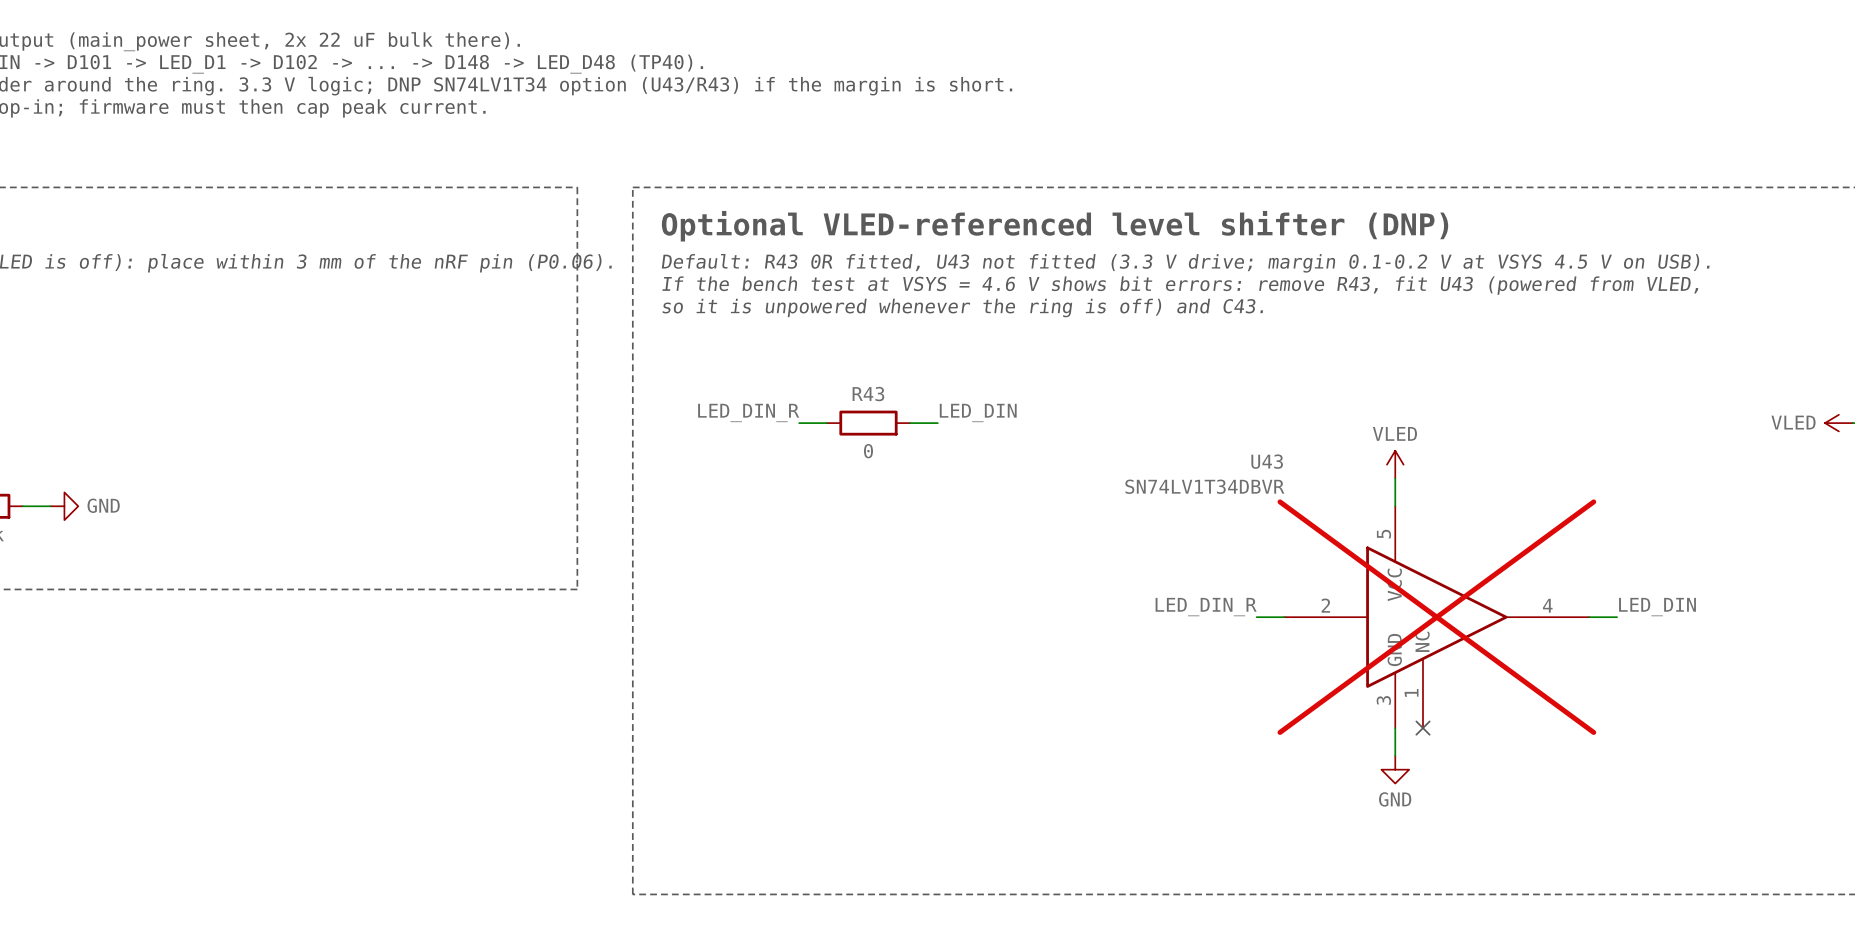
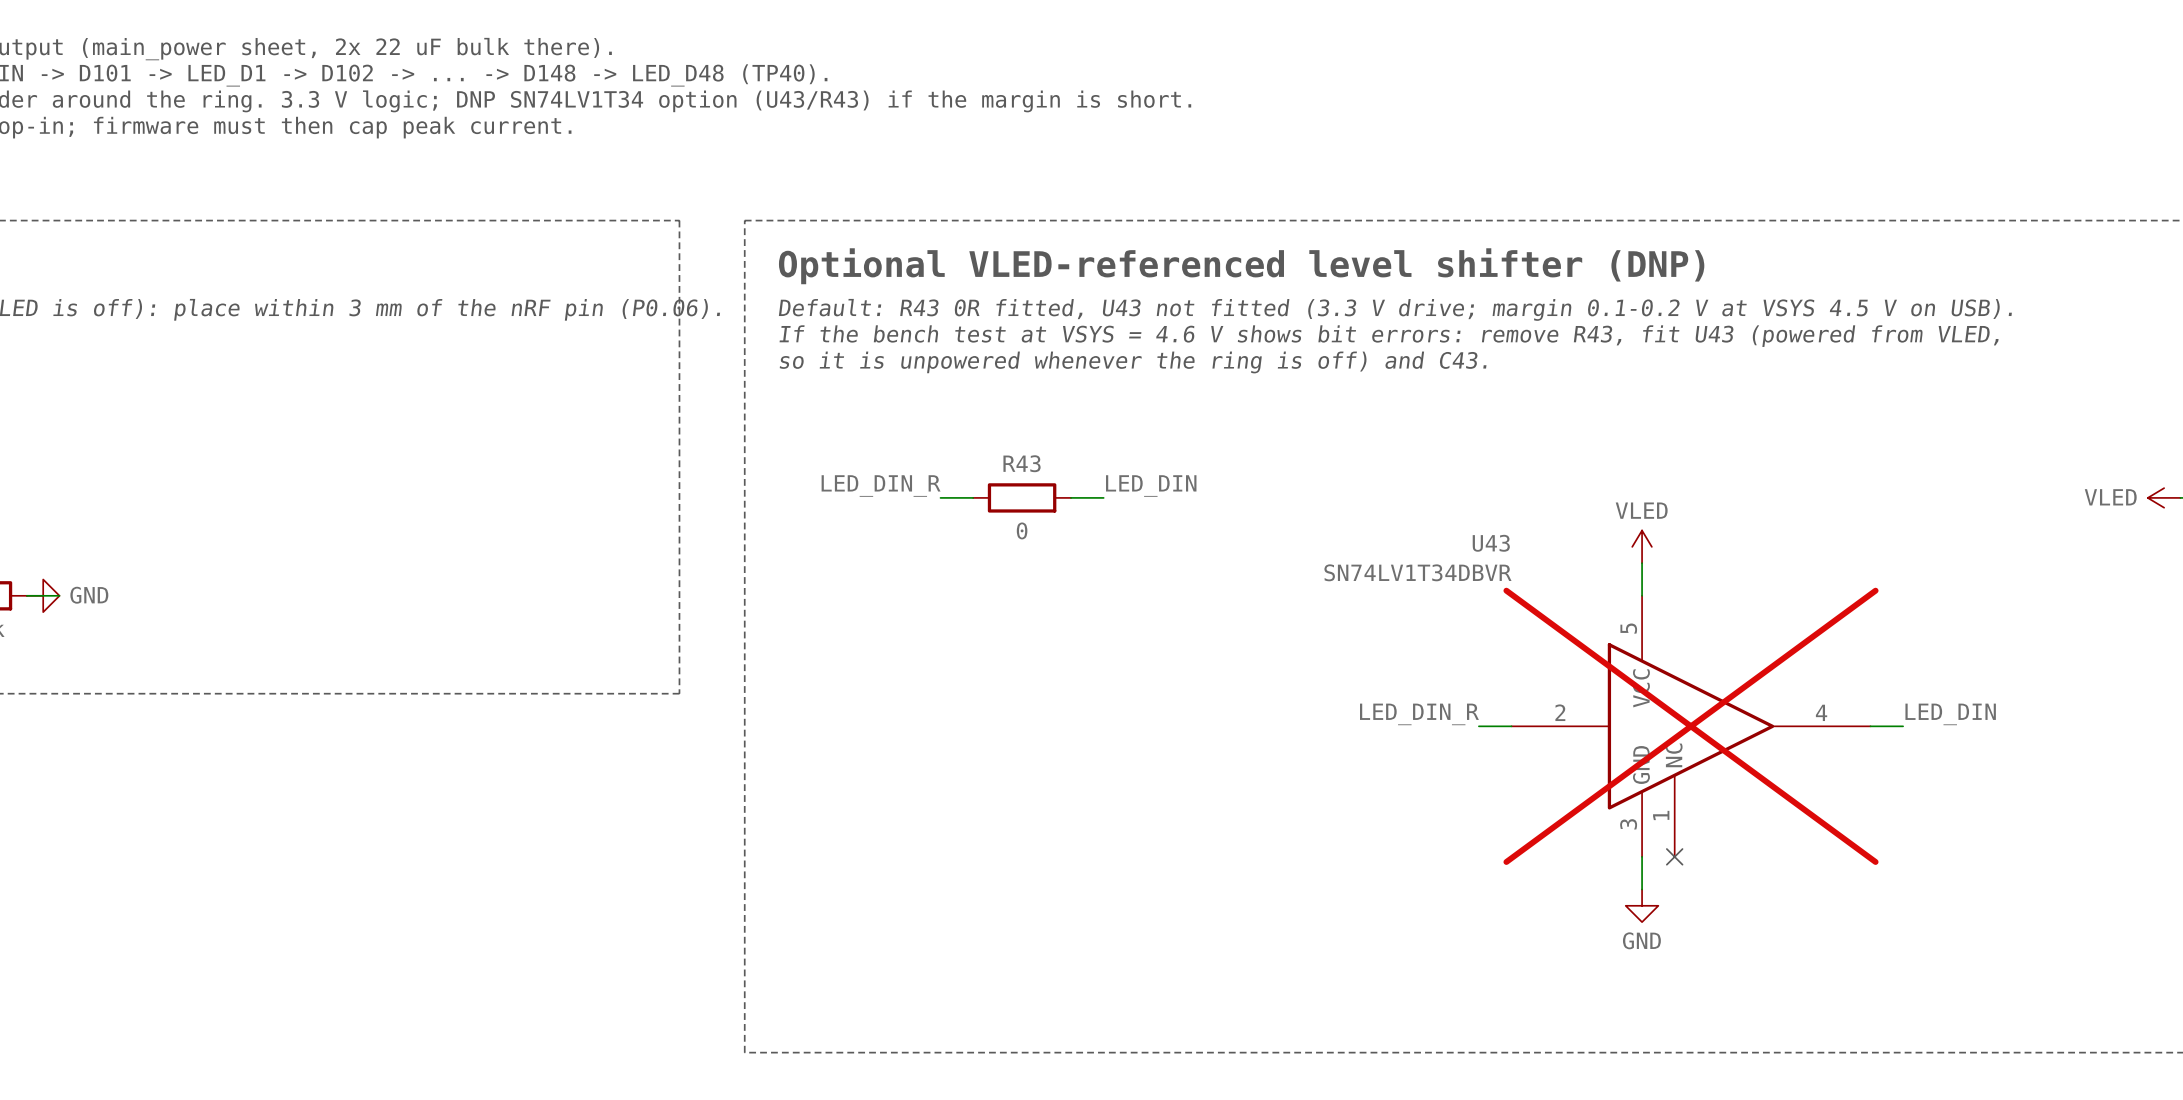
power symbol position: GND (64, 506) -> GND (43, 595)

